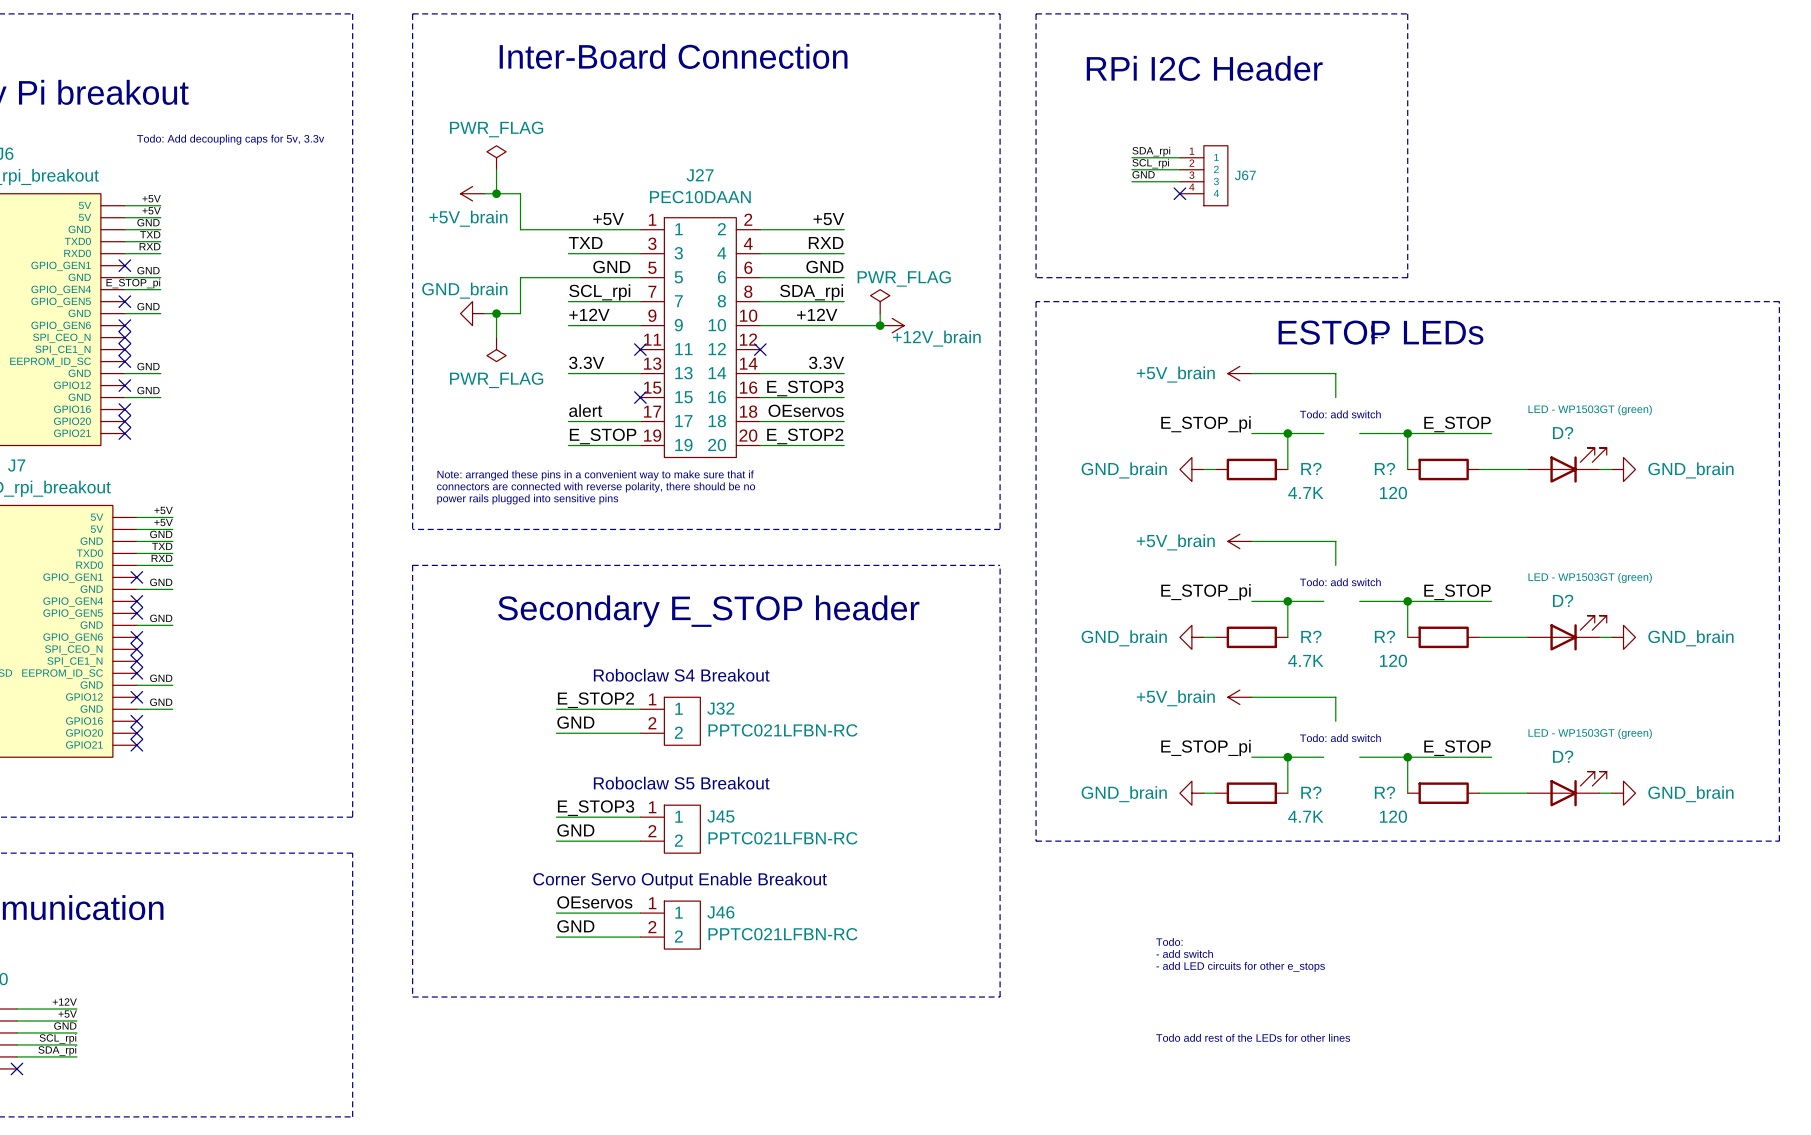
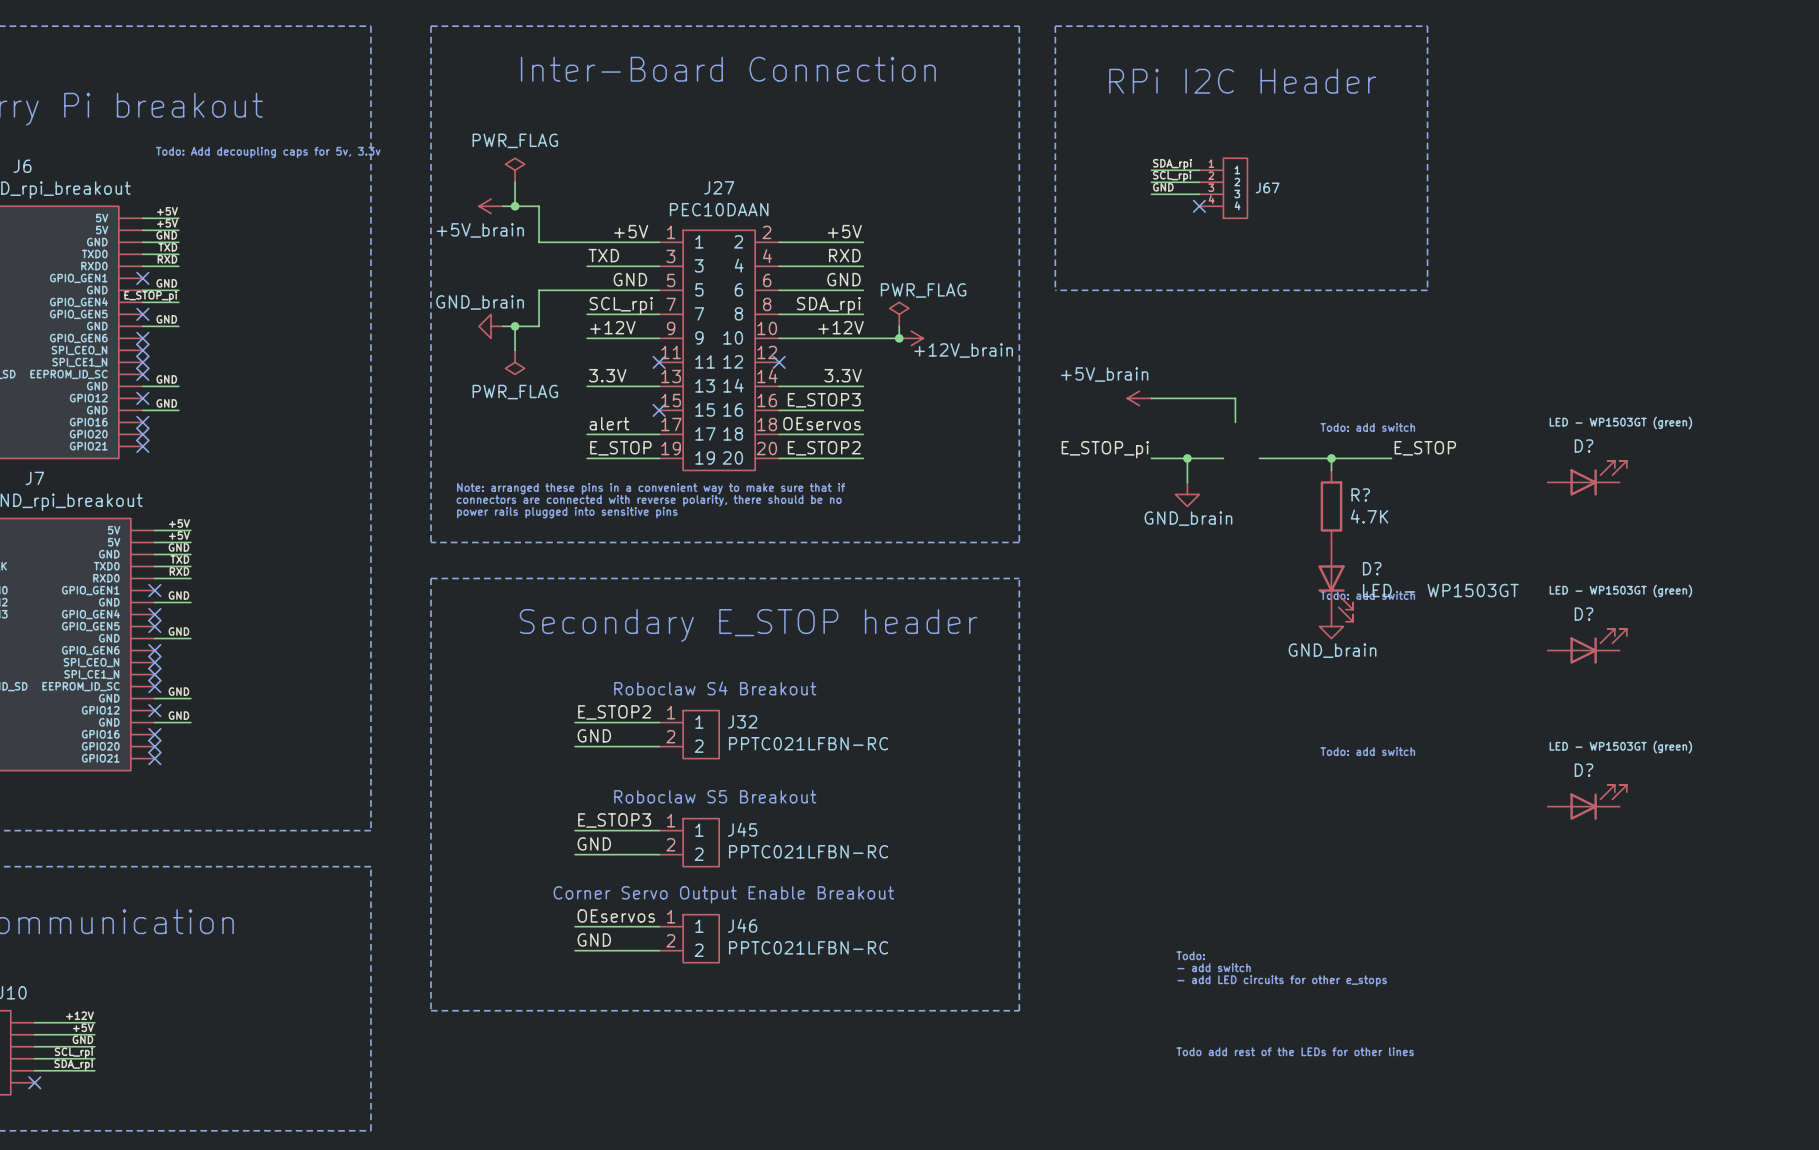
line: (1036, 301) (1036, 841) (1779, 841) (1779, 301) (1036, 301) -> none
line: (1371, 325) (1371, 337) (1383, 337) -> none
text: ESTOP LEDs (1381, 332) -> none
power symbol: +5V_brain (1239, 373) -> none
wire: (1251, 373) (1335, 373) (1335, 397) -> (1151, 398) (1235, 398) (1235, 422)
power symbol: none -> +5V_brain (1139, 398)
label: E_STOP_pi (1205, 424) -> none
label position: E_STOP (1457, 424) -> E_STOP (1425, 448)
wire: (1251, 433) (1323, 433) -> (1151, 458) (1223, 458)
wire: (1287, 433) (1287, 469) -> none
junction position: (1287, 433) -> (1331, 458)
wire: (1359, 433) (1491, 433) -> (1259, 458) (1391, 458)
wire: (1407, 433) (1407, 469) -> none
junction: (1407, 433) -> none
label: none -> E_STOP_pi (1105, 449)
wire: none -> (1187, 458) (1187, 482)
junction: none -> (1187, 458)
wire: none -> (1331, 458) (1331, 470)
R? name position: R? (1311, 468) -> R? (1360, 494)
power symbol rotation: 0° (1191, 469) -> 90° counterclockwise (1187, 494)
power symbol position: GND_brain (1191, 469) -> GND_brain (1187, 494)
wire: (1203, 469) (1215, 469) -> none
R? rotation: 0° (1251, 469) -> 90° clockwise (1331, 506)
R? position: (1251, 469) -> (1331, 506)
R?: 120 (1443, 469) -> none
wire: (1479, 469) (1527, 469) -> none
wire: (1599, 469) (1611, 469) -> none
power symbol: GND_brain (1623, 469) -> none
power symbol text position: GND_brain (1124, 470) -> GND_brain (1188, 518)
R? value position: 4.7K (1305, 493) -> 4.7K (1369, 516)
power symbol: +5V_brain (1239, 541) -> none
wire: (1251, 541) (1335, 541) (1335, 565) -> none
D?: none -> LED - WP1503GT (1335, 582)
label: E_STOP_pi (1205, 592) -> none
label: E_STOP (1457, 592) -> none
wire: (1251, 601) (1323, 601) -> none
wire: (1287, 601) (1287, 637) -> none
junction: (1287, 601) -> none
wire: (1359, 601) (1491, 601) -> none
wire: (1407, 601) (1407, 637) -> none
junction: (1407, 601) -> none
power symbol: none -> GND_brain (1331, 626)
power symbol: GND_brain (1191, 637) -> none
wire: (1203, 637) (1215, 637) -> none
R?: 4.7K (1251, 637) -> none
R?: 120 (1443, 637) -> none
wire: (1479, 637) (1527, 637) -> none
wire: (1599, 637) (1611, 637) -> none
power symbol: GND_brain (1623, 637) -> none
power symbol: +5V_brain (1239, 697) -> none
wire: (1251, 697) (1335, 697) (1335, 721) -> none
label: E_STOP_pi (1205, 748) -> none
label: E_STOP (1457, 748) -> none
wire: (1251, 757) (1323, 757) -> none
wire: (1287, 757) (1287, 793) -> none
junction: (1287, 757) -> none
wire: (1359, 757) (1491, 757) -> none
wire: (1407, 757) (1407, 793) -> none
junction: (1407, 757) -> none
power symbol: GND_brain (1191, 793) -> none
wire: (1203, 793) (1215, 793) -> none
R?: 4.7K (1251, 793) -> none
R?: 120 (1443, 793) -> none
wire: (1479, 793) (1527, 793) -> none
wire: (1599, 793) (1611, 793) -> none
power symbol: GND_brain (1623, 793) -> none

